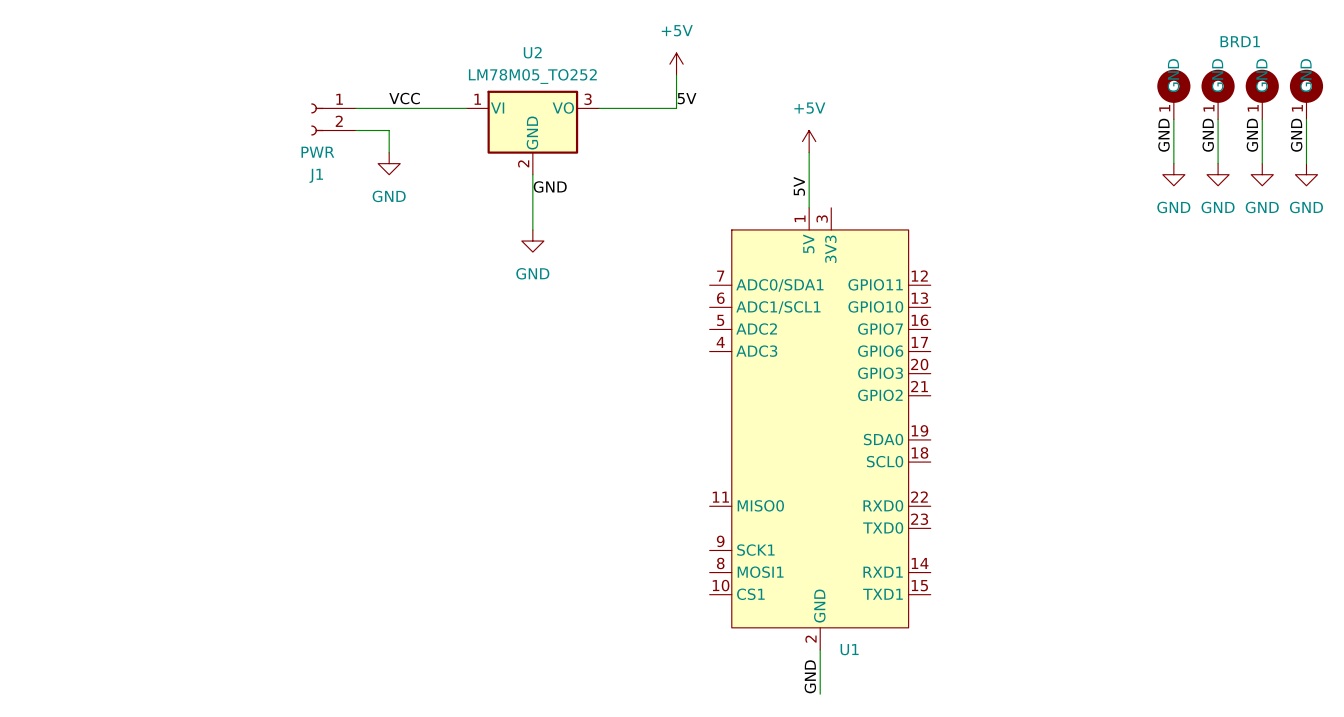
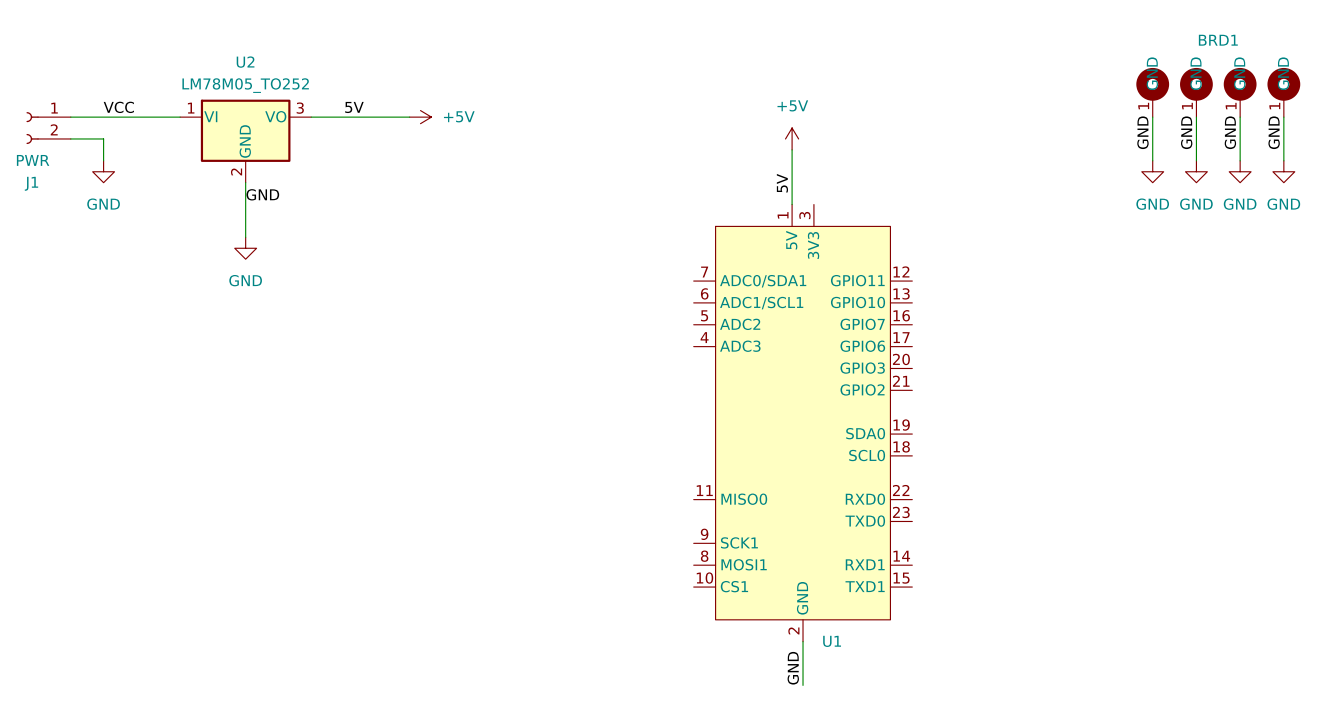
power symbol: +5V (676, 64) -> none
wire: (676, 75) (676, 108) (599, 108) -> none
label: VCC (404, 98) -> none
label: 5V (687, 98) -> none
wire: (356, 108) (466, 108) -> none
label: none -> VCC (118, 107)
label: none -> 5V (354, 107)
wire: none -> (70, 117) (180, 117)
wire: none -> (311, 117) (409, 117)
J1 position: (333, 119) -> (48, 128)
power symbol: none -> +5V (420, 117)
wire: (356, 130) (389, 130) (389, 152) -> none
U2 position: (532, 132) -> (245, 141)
wire: none -> (70, 138) (103, 138) (103, 160)
power symbol: GND (389, 163) -> none
power symbol: none -> GND (103, 171)
wire: (532, 174) (532, 229) -> none
wire: none -> (245, 182) (245, 237)
label: GND (550, 186) -> none
label: none -> GND (262, 194)
power symbol: GND (532, 241) -> none
power symbol: none -> GND (245, 248)

